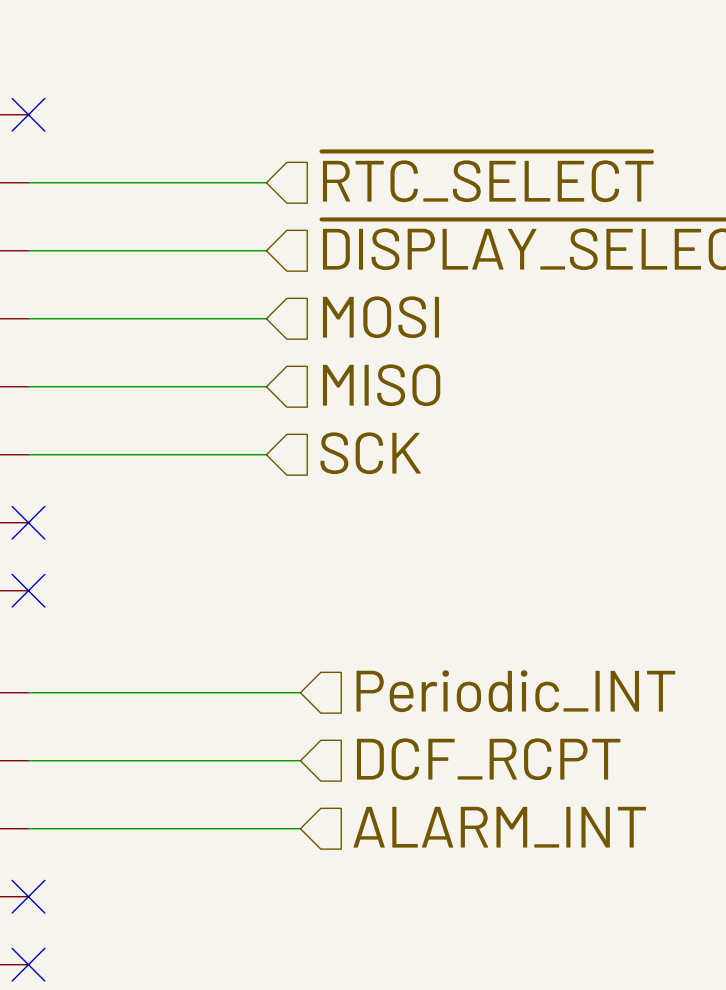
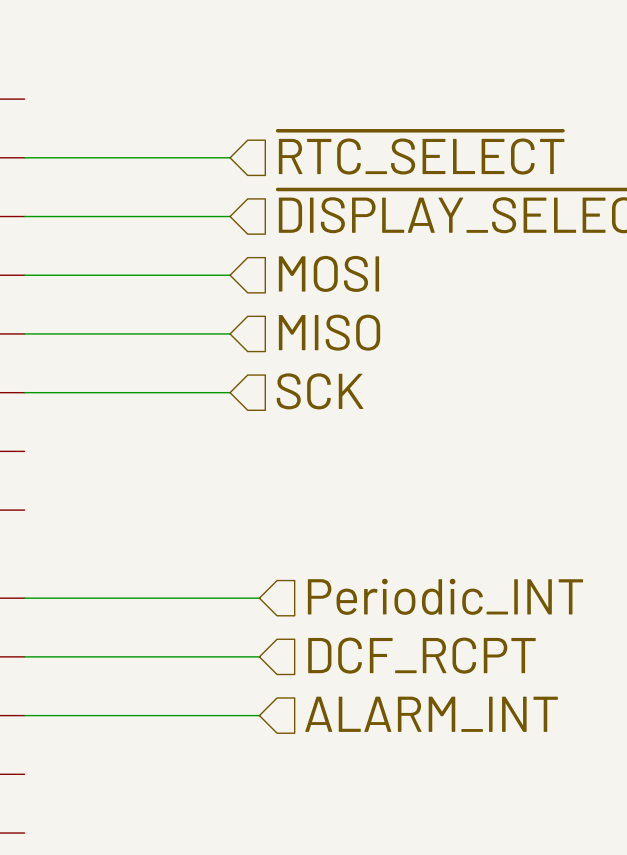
no-connect mark: (28, 114) -> none
no-connect mark: (28, 522) -> none
no-connect mark: (28, 590) -> none
no-connect mark: (28, 896) -> none
no-connect mark: (28, 964) -> none

